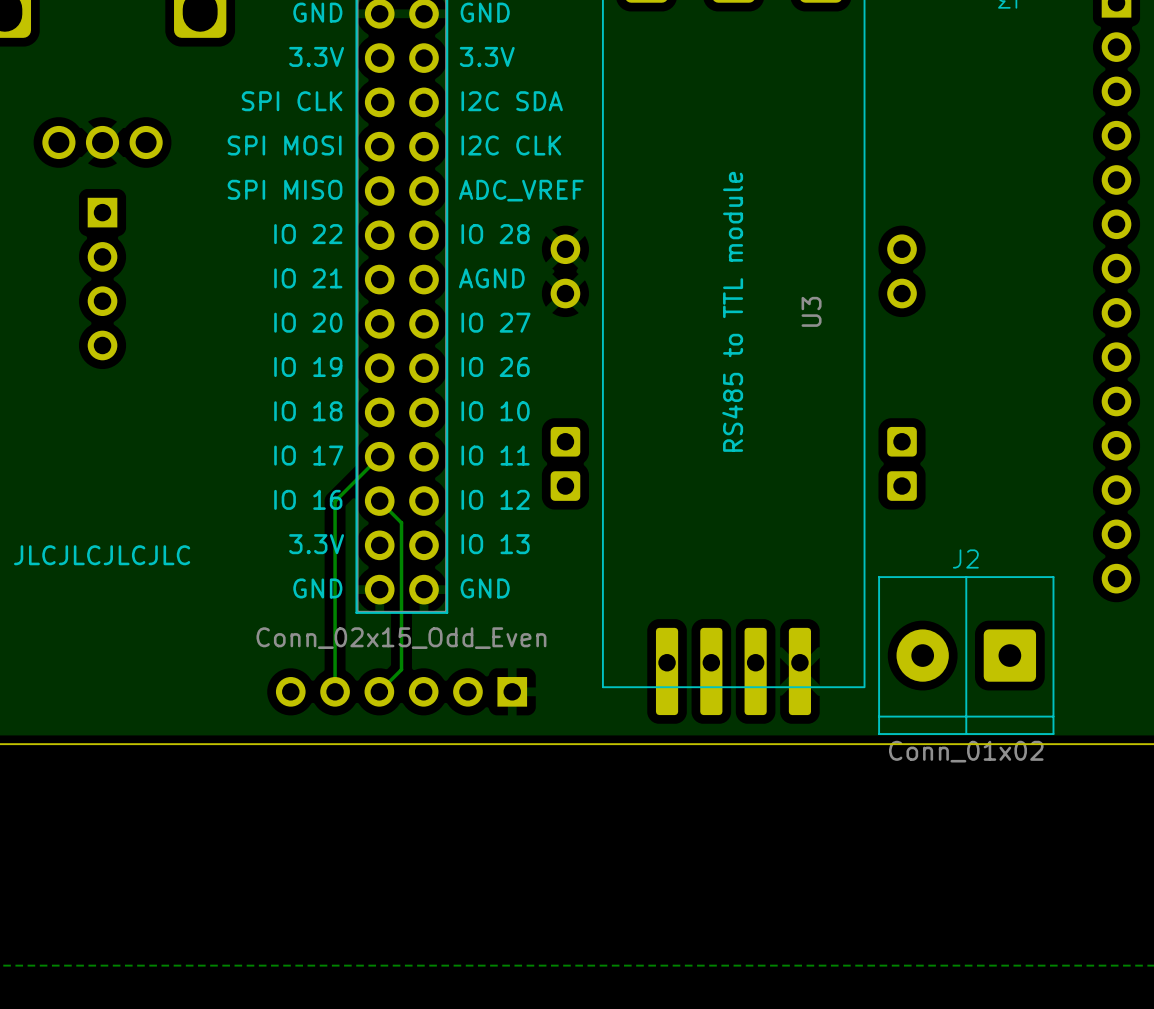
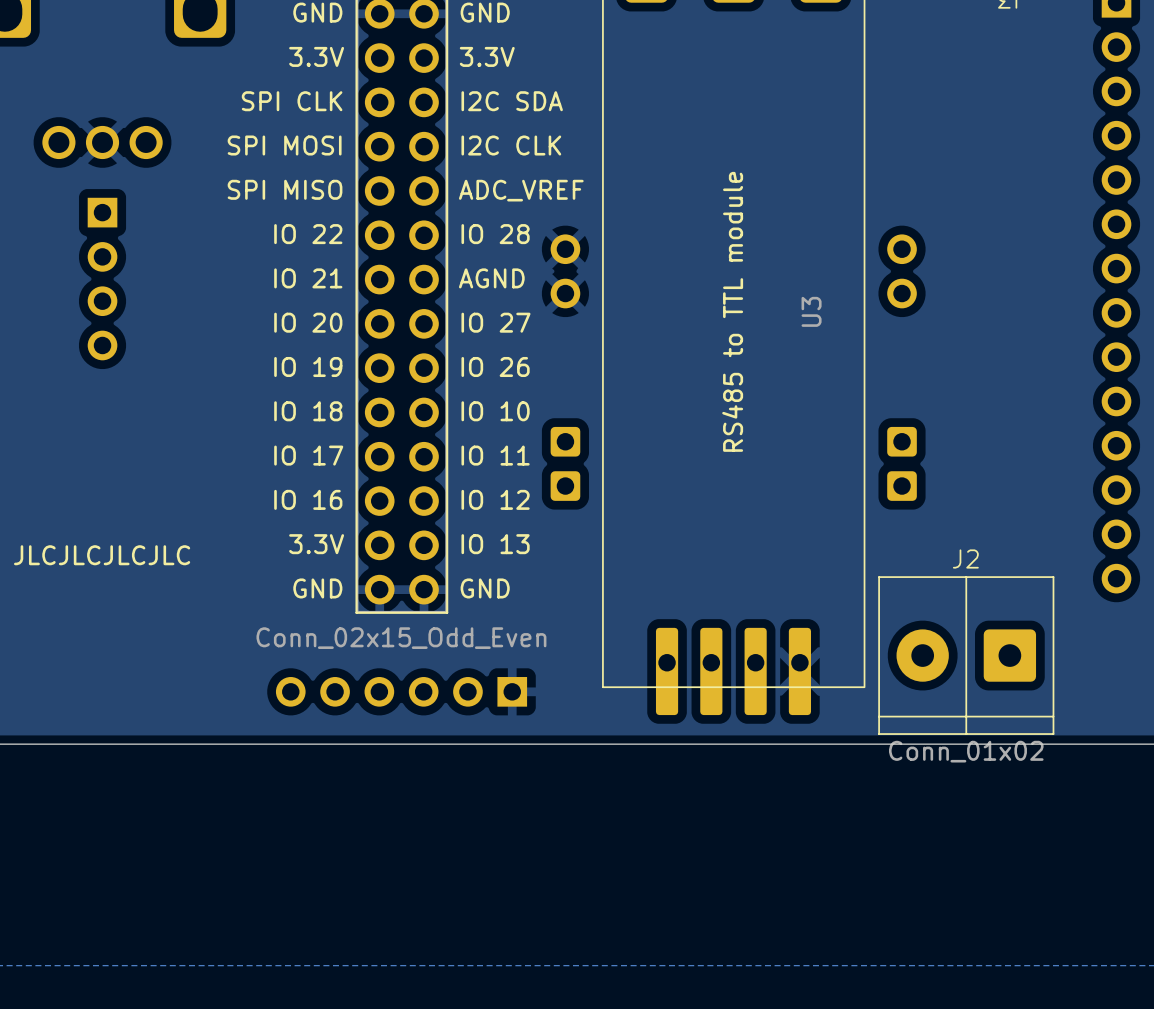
track: (379, 456) (335, 501) (335, 691) -> none
track: (379, 501) (401, 522) (401, 669) (379, 691) -> none

